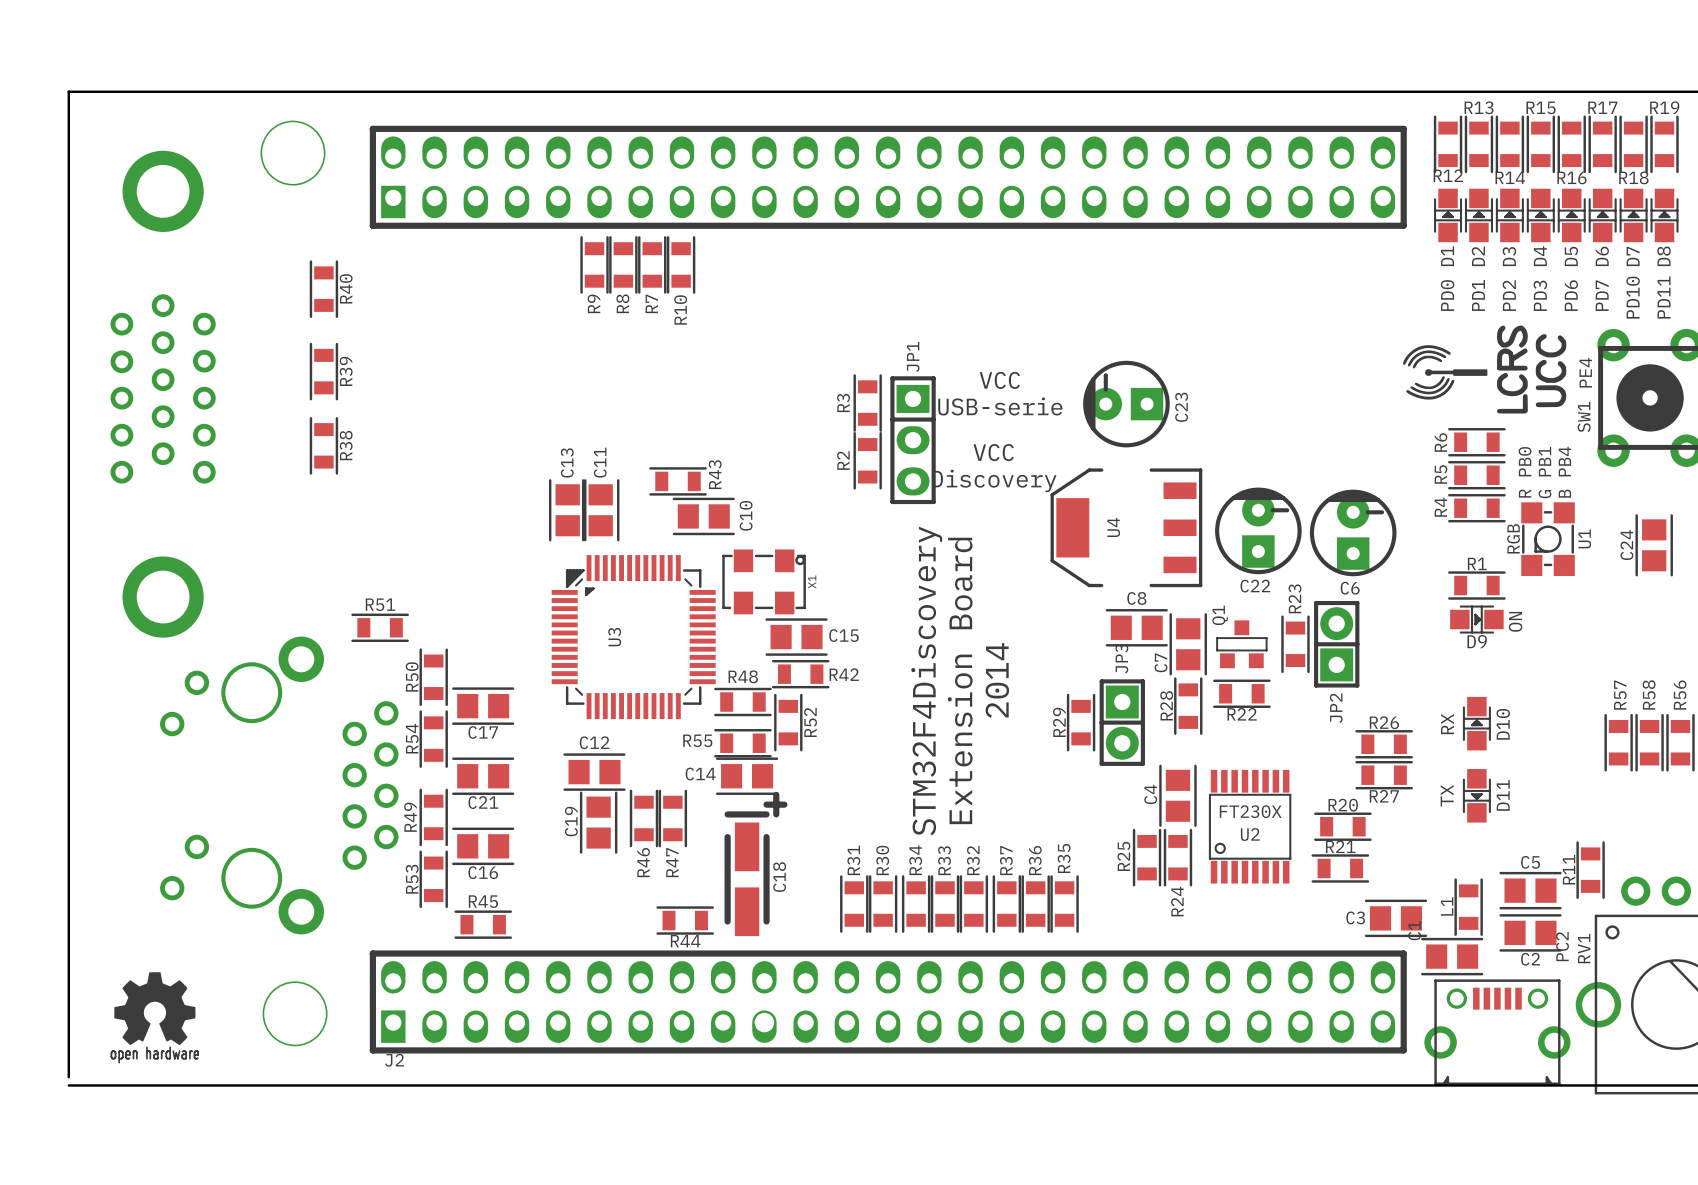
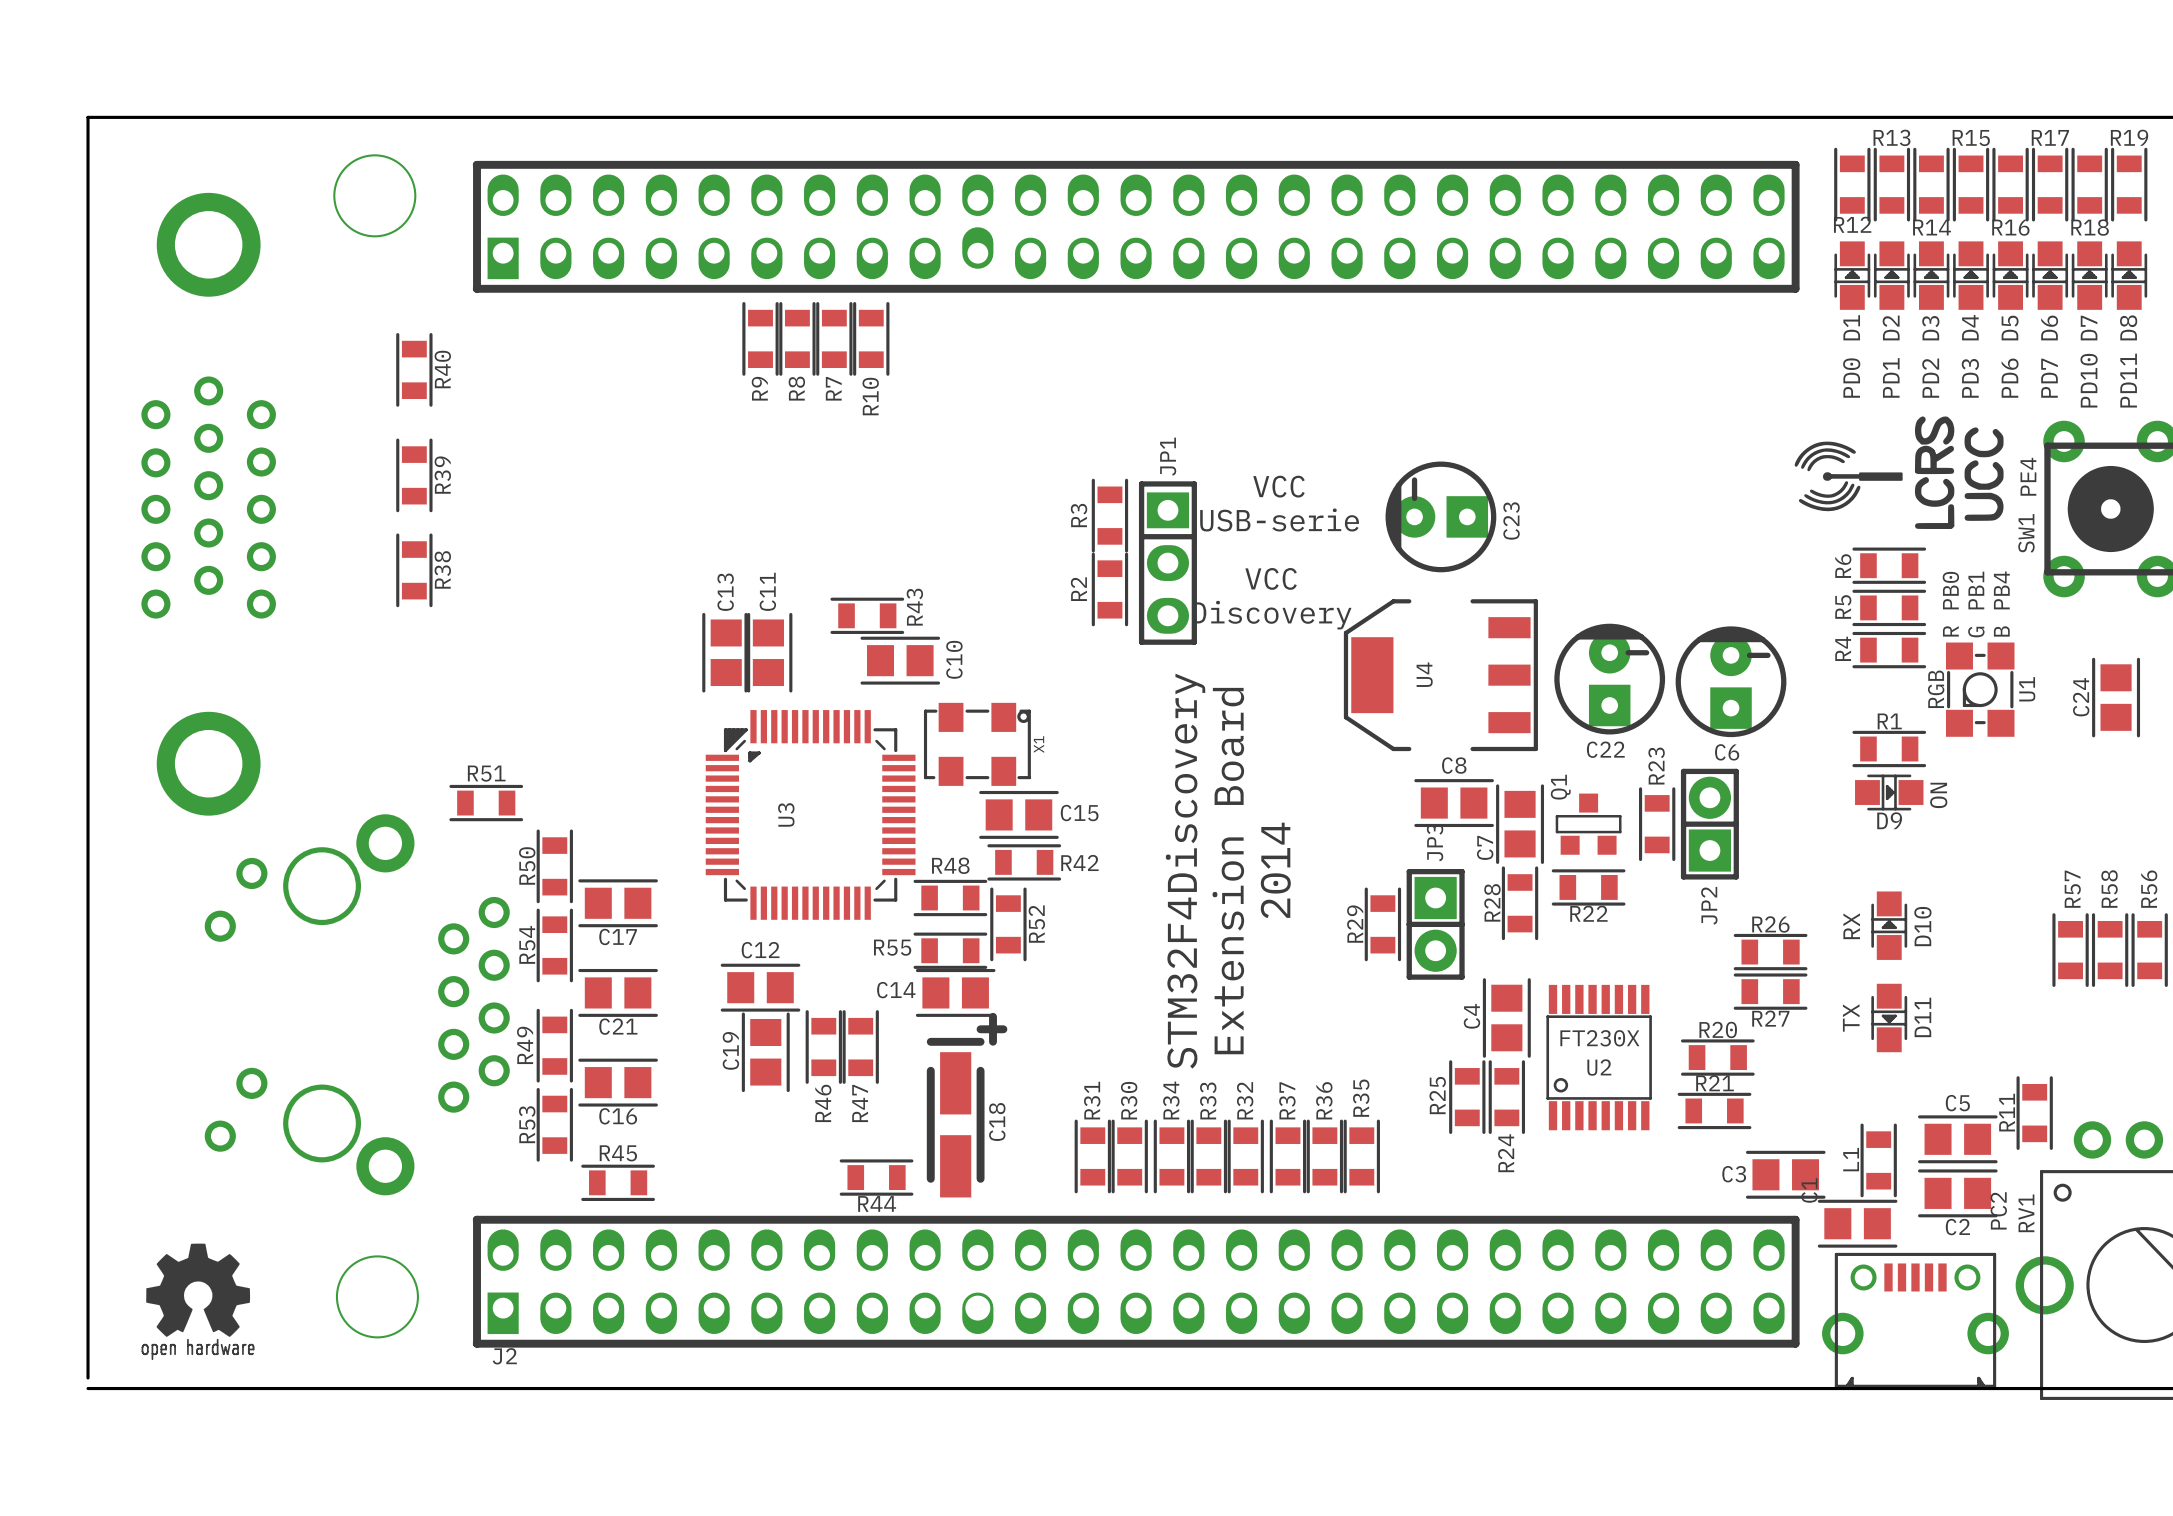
J2 footprint: [369, 125, 1407, 1054] -> [472, 160, 1800, 1348]

